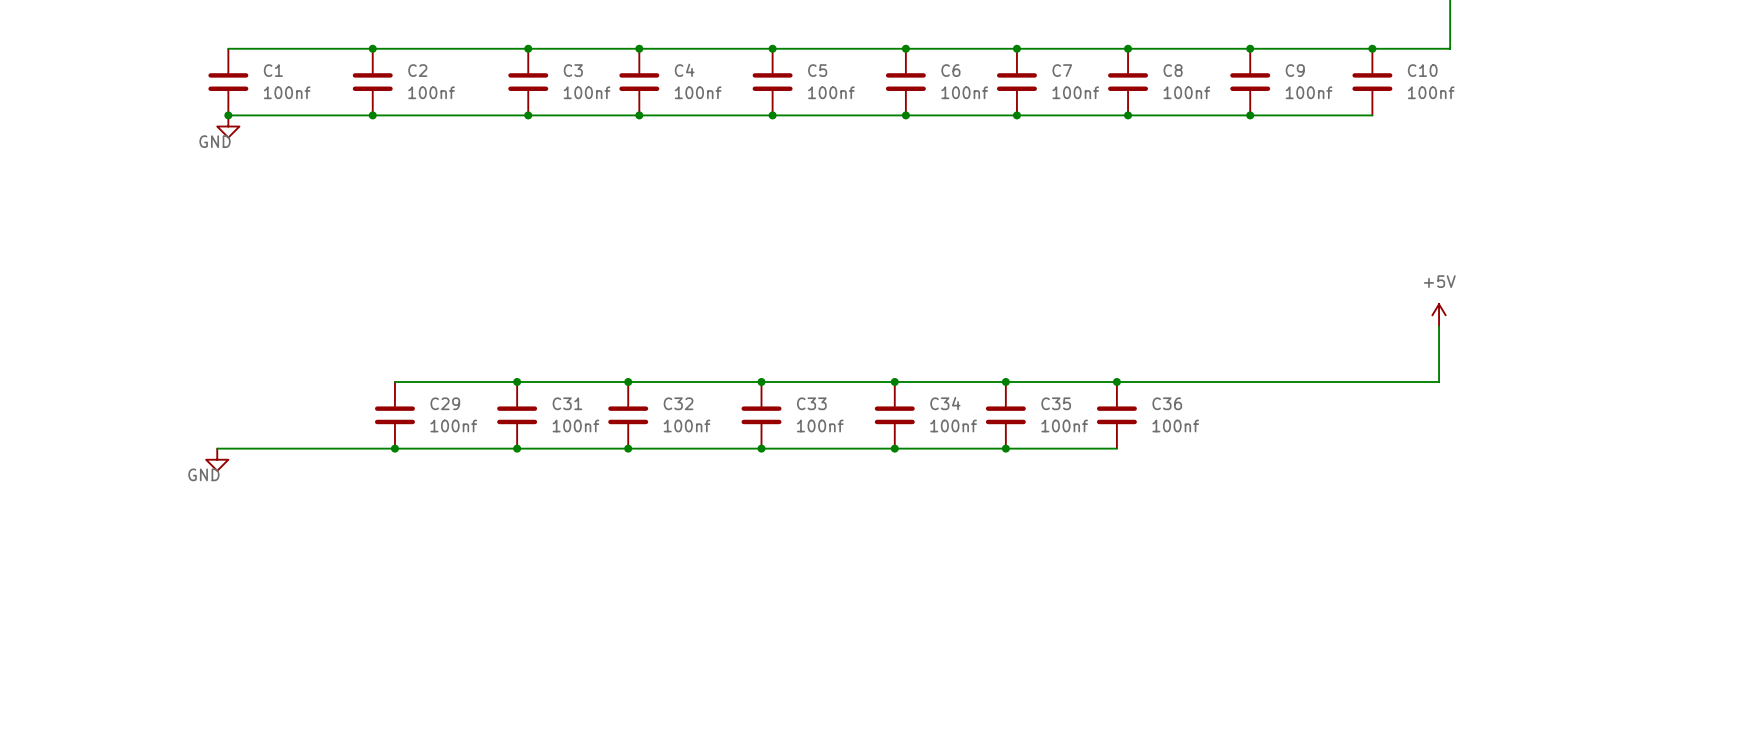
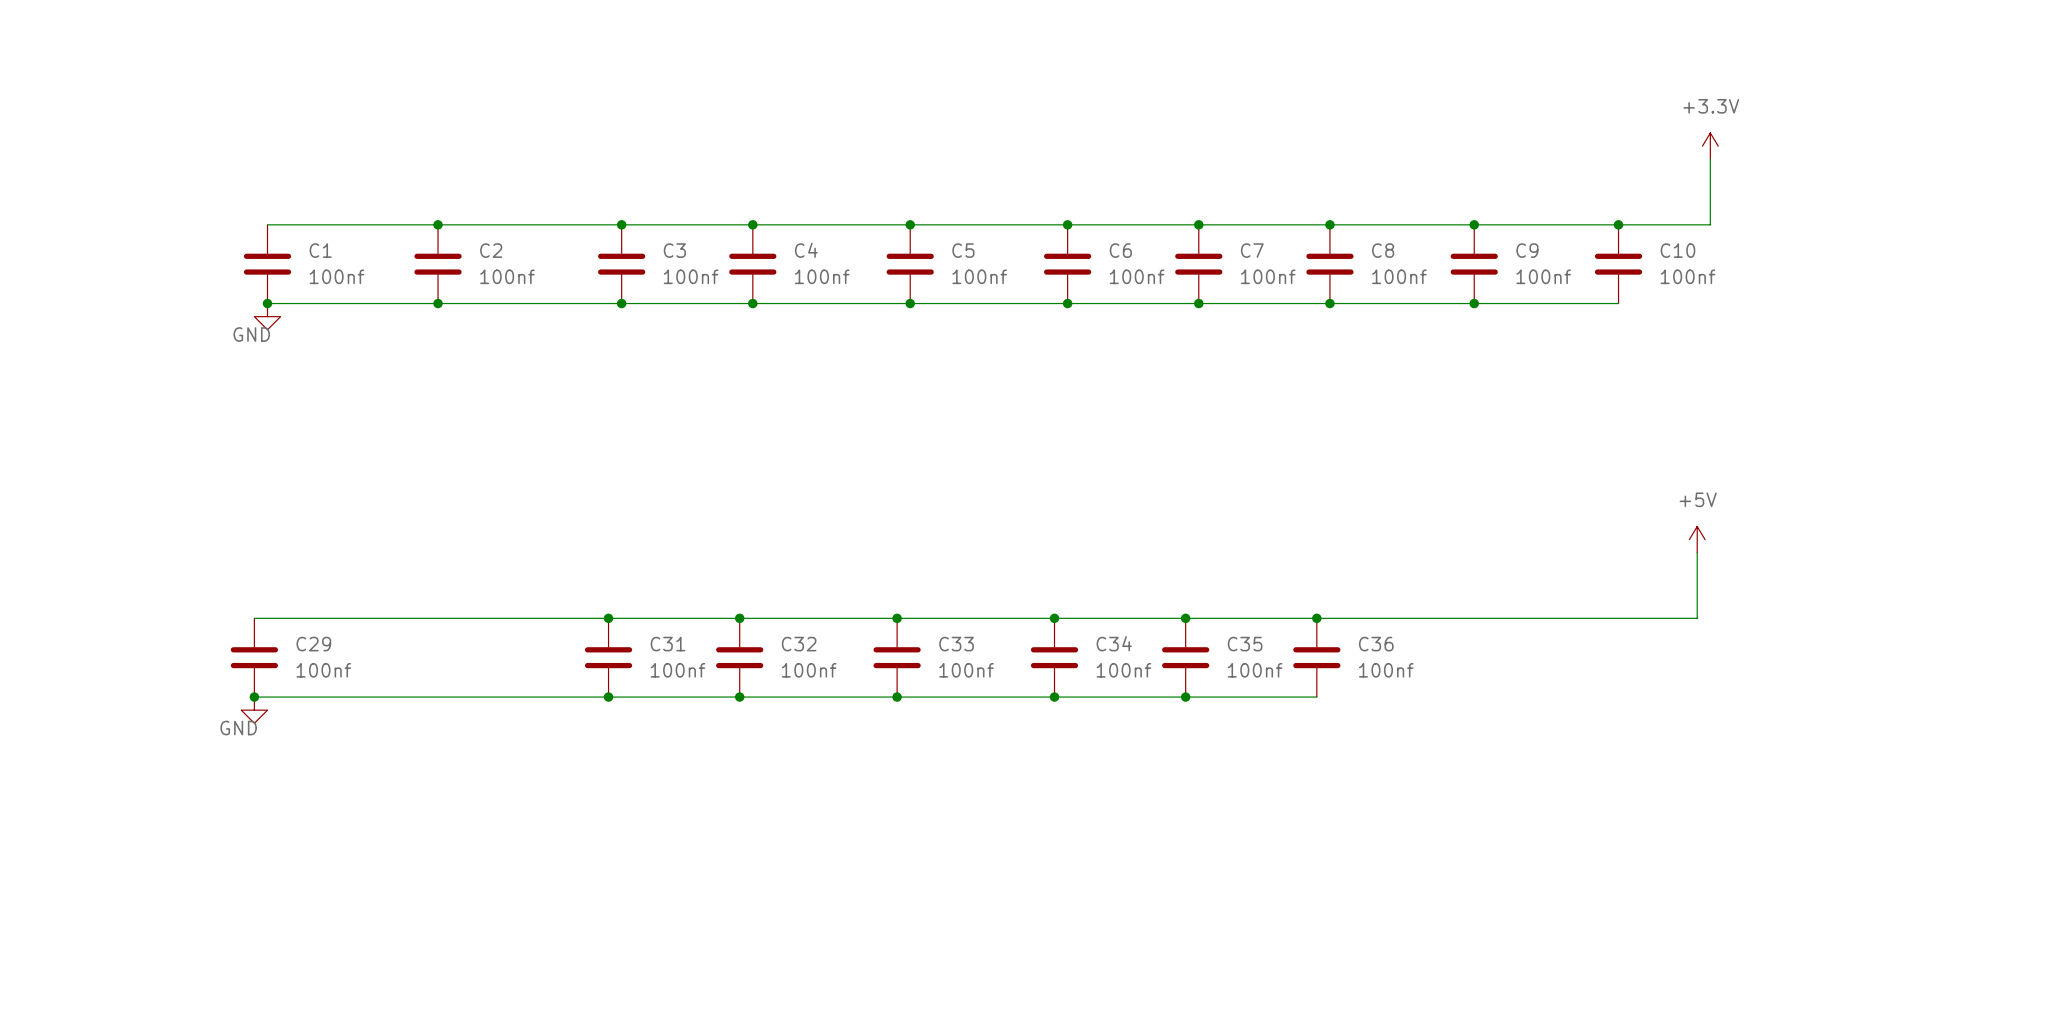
wire: none -> (254, 618) (464, 618)
C29 position: (394, 415) -> (254, 657)
junction: none -> (254, 697)
junction: (394, 448) -> none

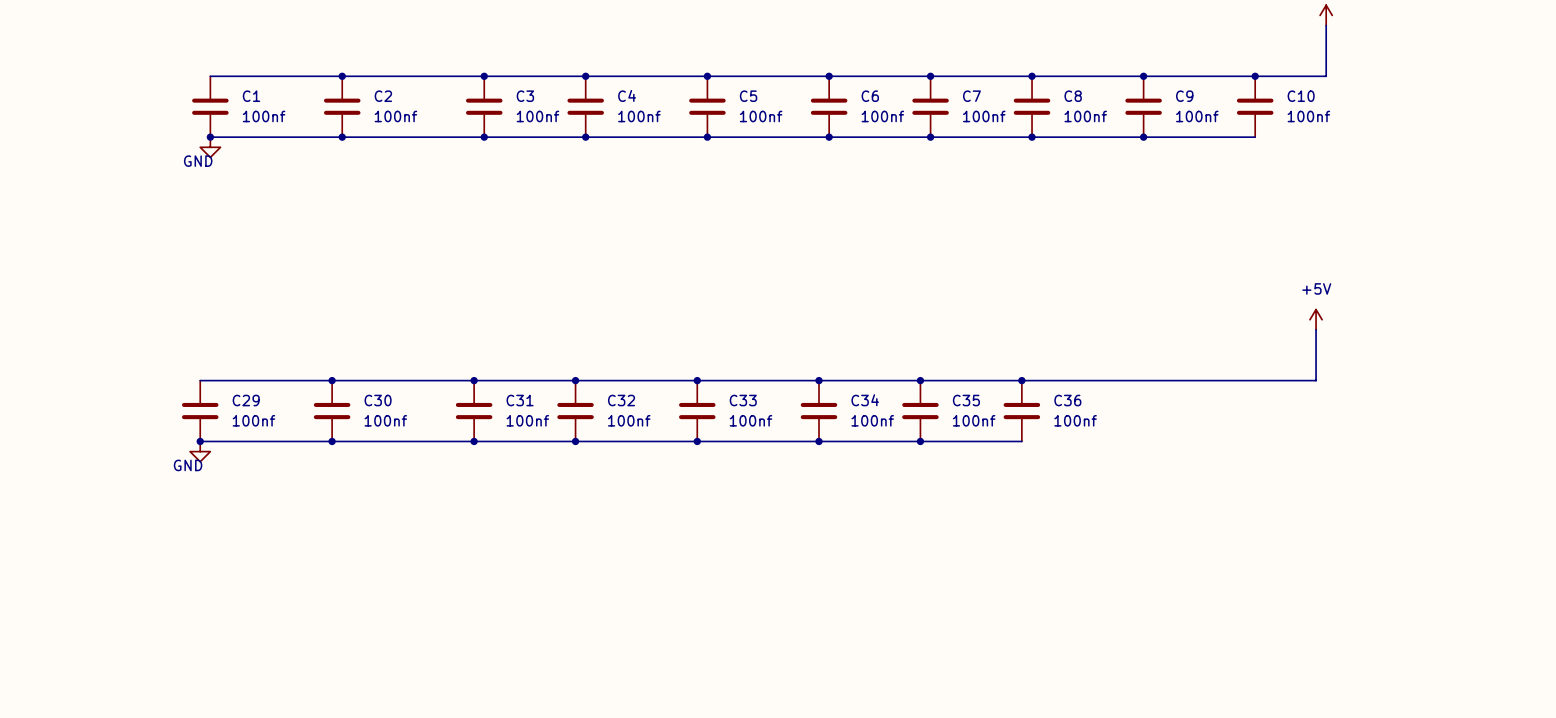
junction: none -> (332, 380)
C30: none -> 100nf (332, 411)
junction: none -> (332, 441)

